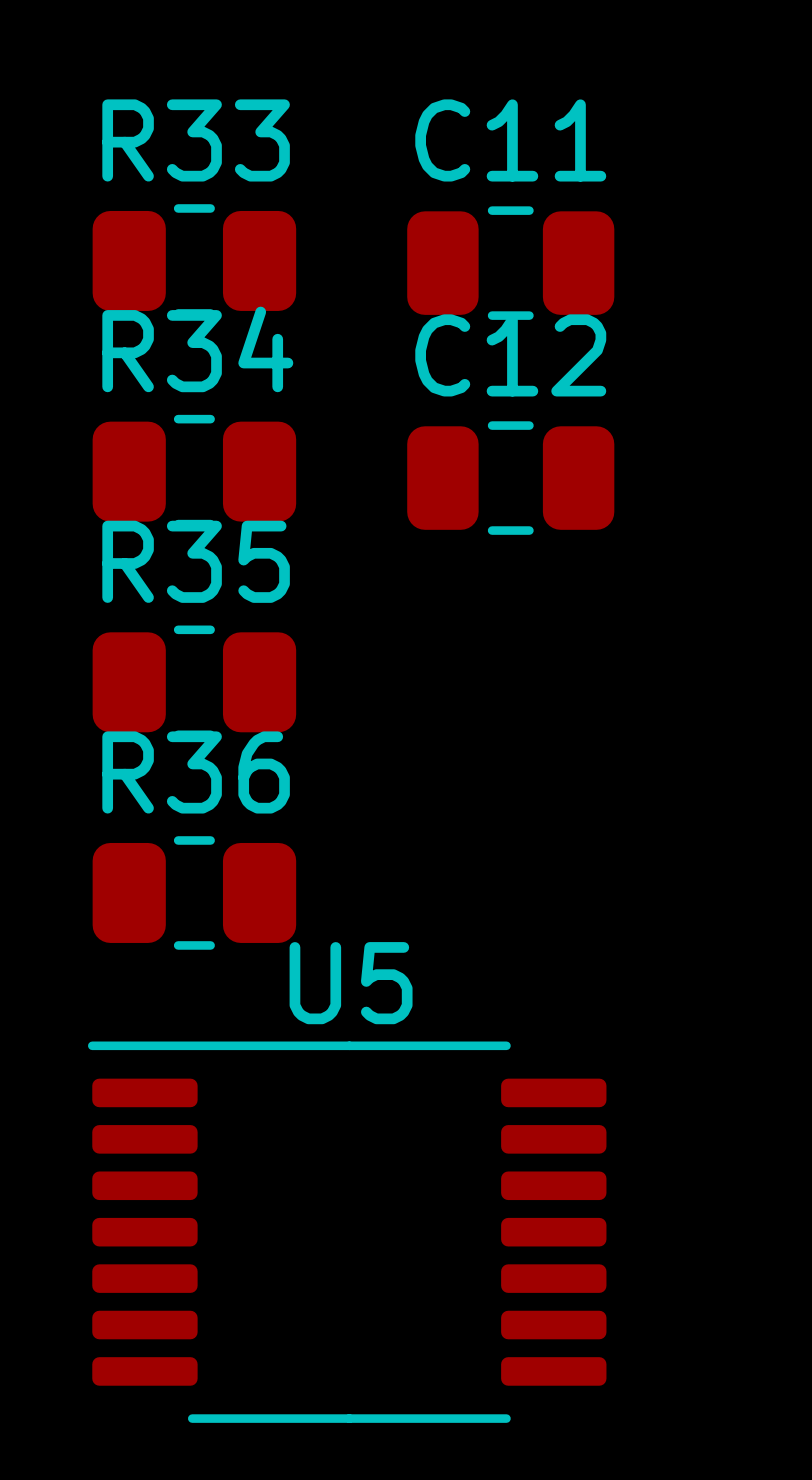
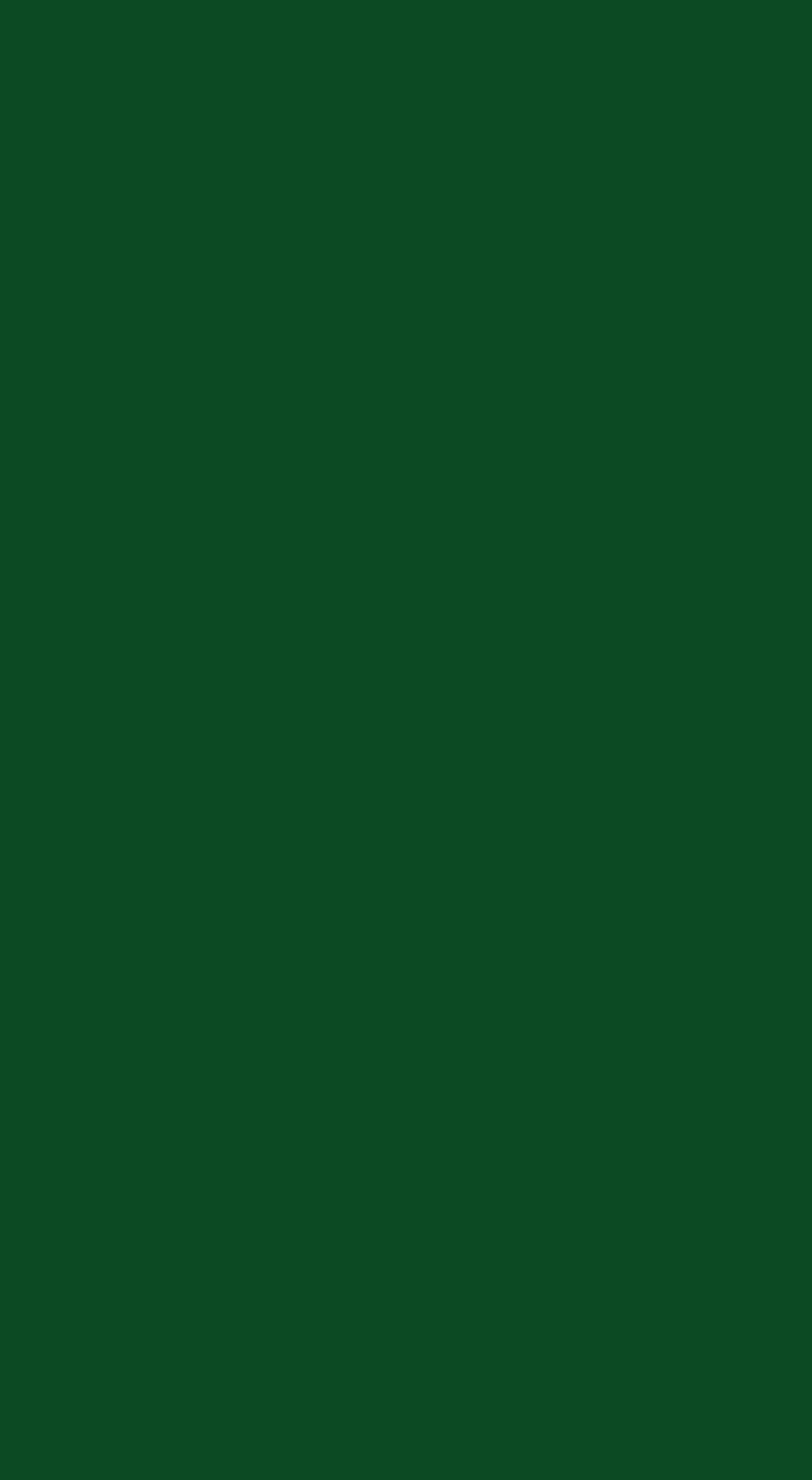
R33: (194, 260) -> none
C11: (510, 263) -> none
R34: (194, 471) -> none
C12: (510, 478) -> none
R35: (194, 682) -> none
R36: (194, 892) -> none
U5: (347, 1232) -> none

